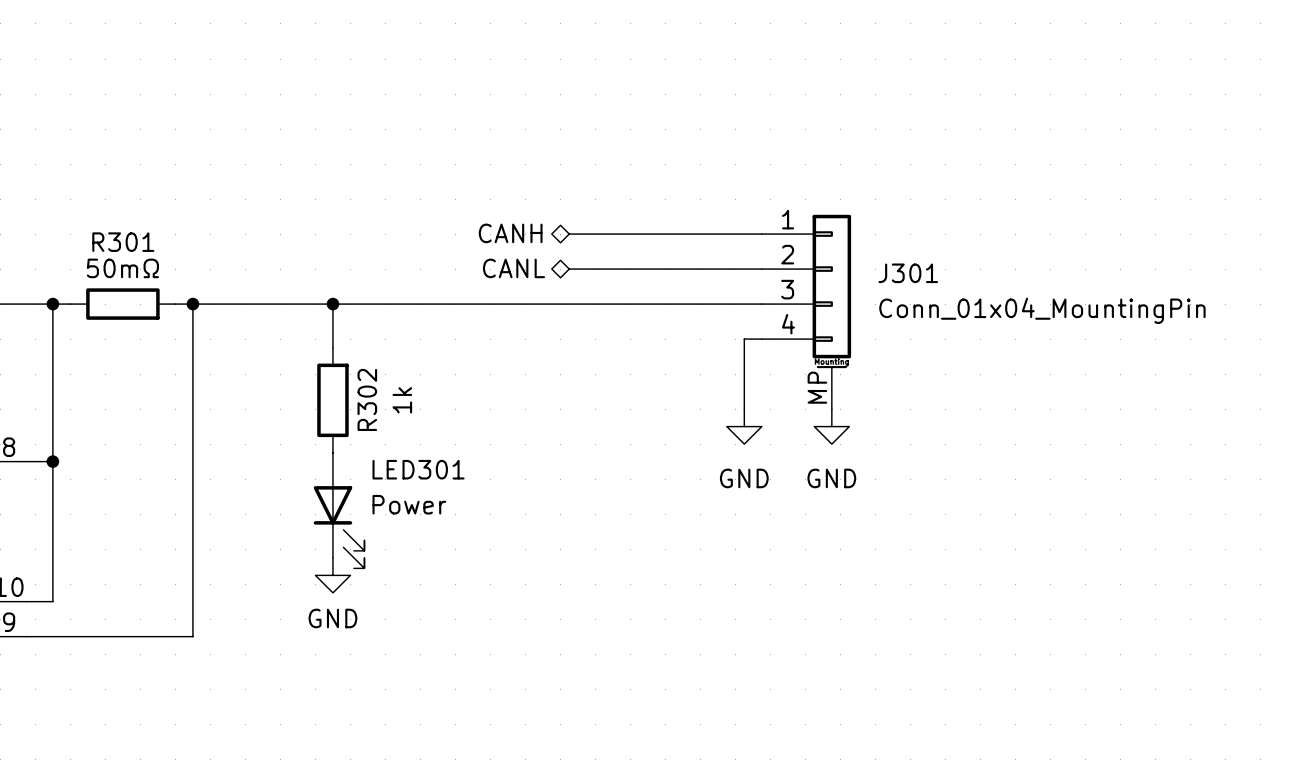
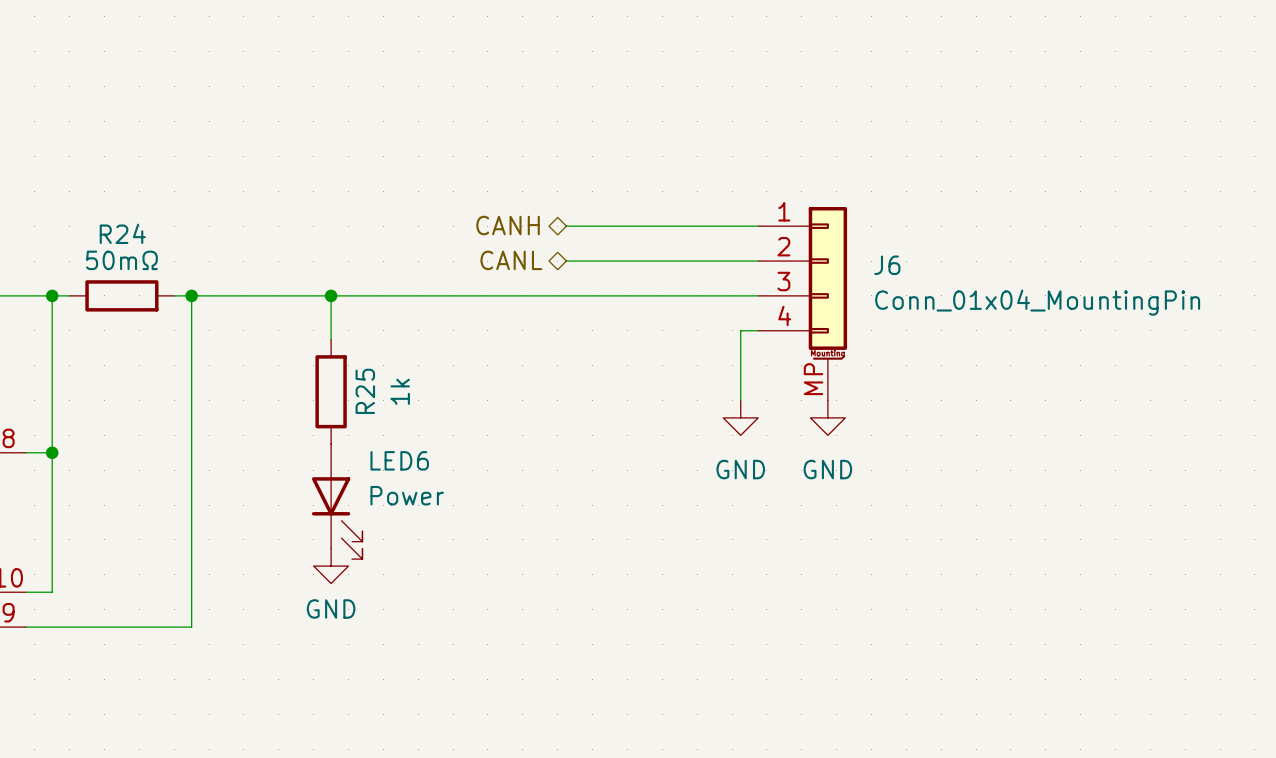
R301 name: R301 (123, 242) -> R24 (122, 233)
J301 name: J301 (908, 273) -> J6 (887, 265)
R302 name: R302 (367, 399) -> R25 (365, 391)
LED301 name: LED301 (418, 469) -> LED6 (399, 460)

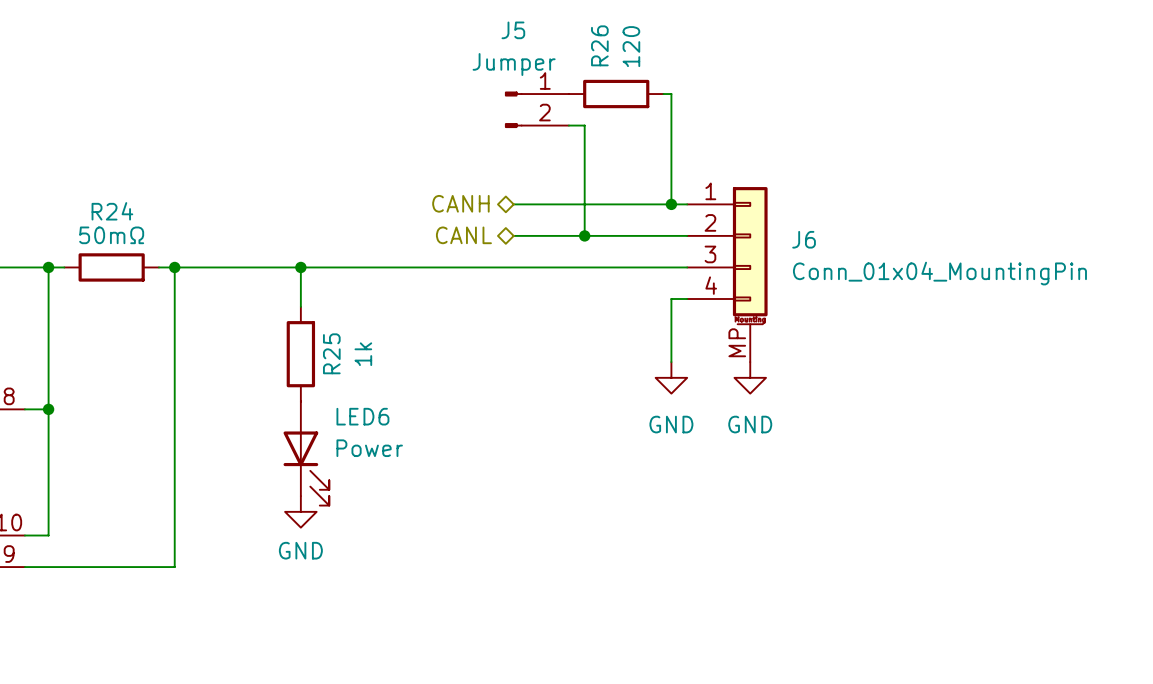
R26: none -> 120 (616, 94)
wire: none -> (663, 94) (671, 94) (671, 204)
J5: none -> Jumper (536, 109)
wire: none -> (568, 125) (584, 125) (584, 235)
junction: none -> (671, 204)
junction: none -> (584, 235)

